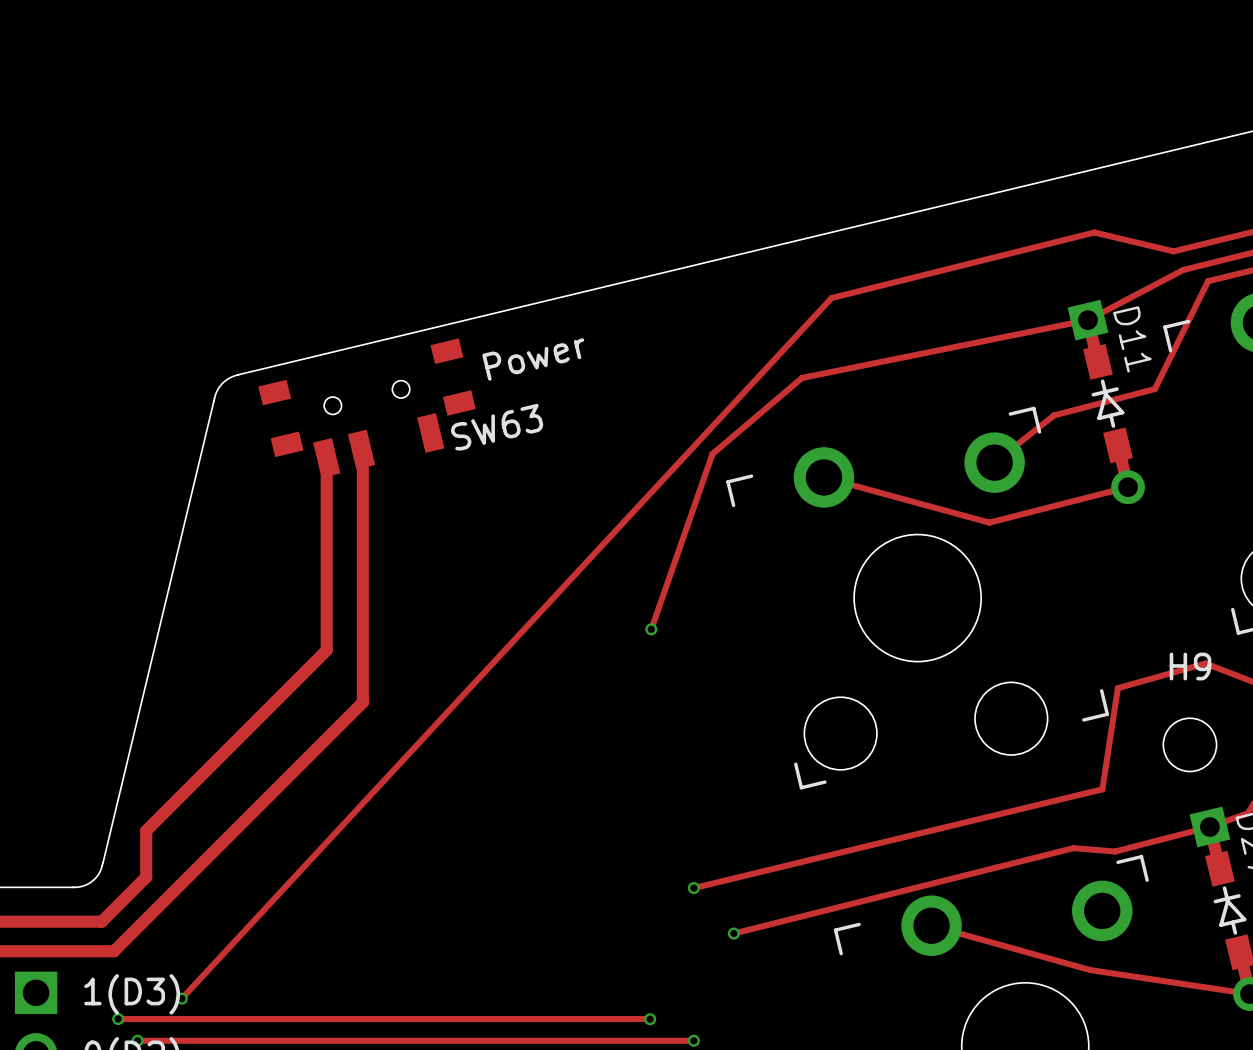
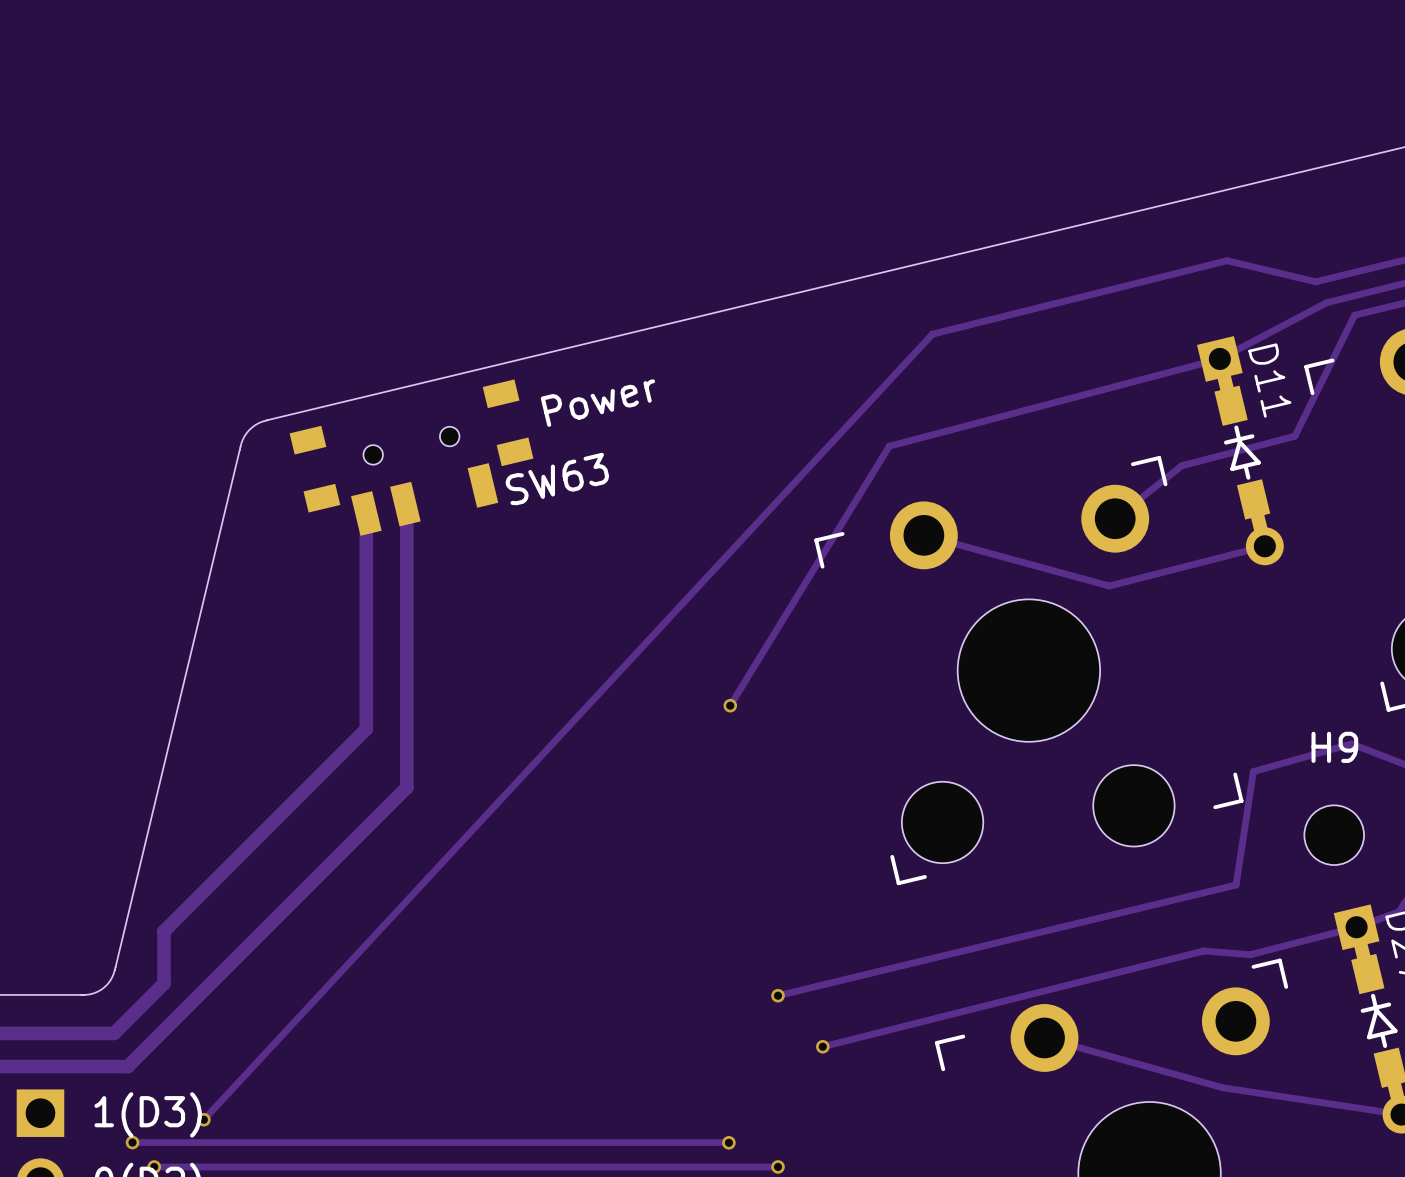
track: (1087, 320) (802, 377) (712, 453) (651, 629) -> (1219, 358) (889, 446) (730, 705)

